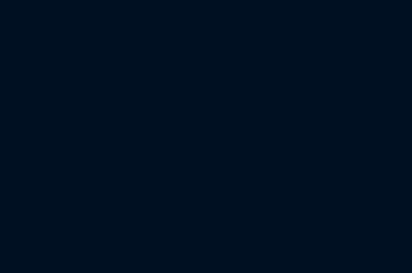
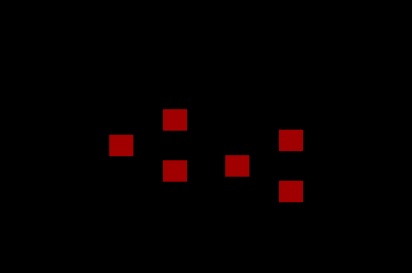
part: none -> (148, 145)
part: none -> (264, 165)

